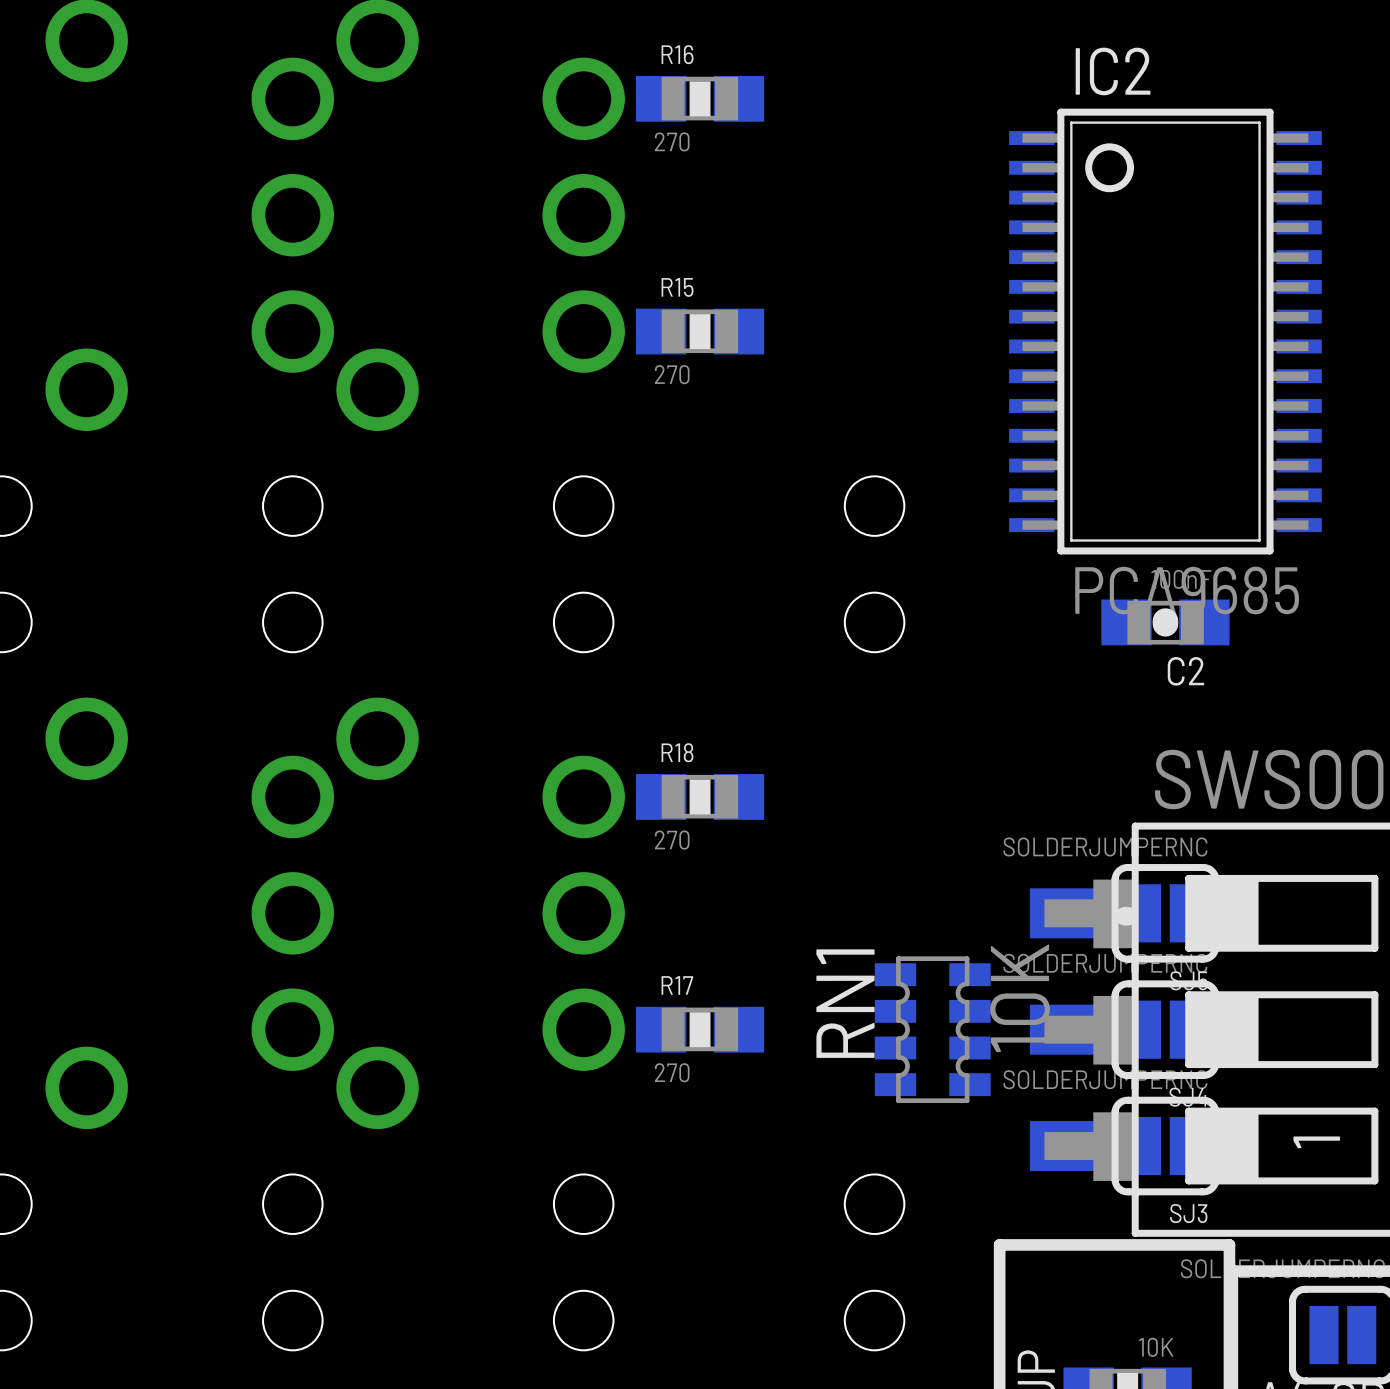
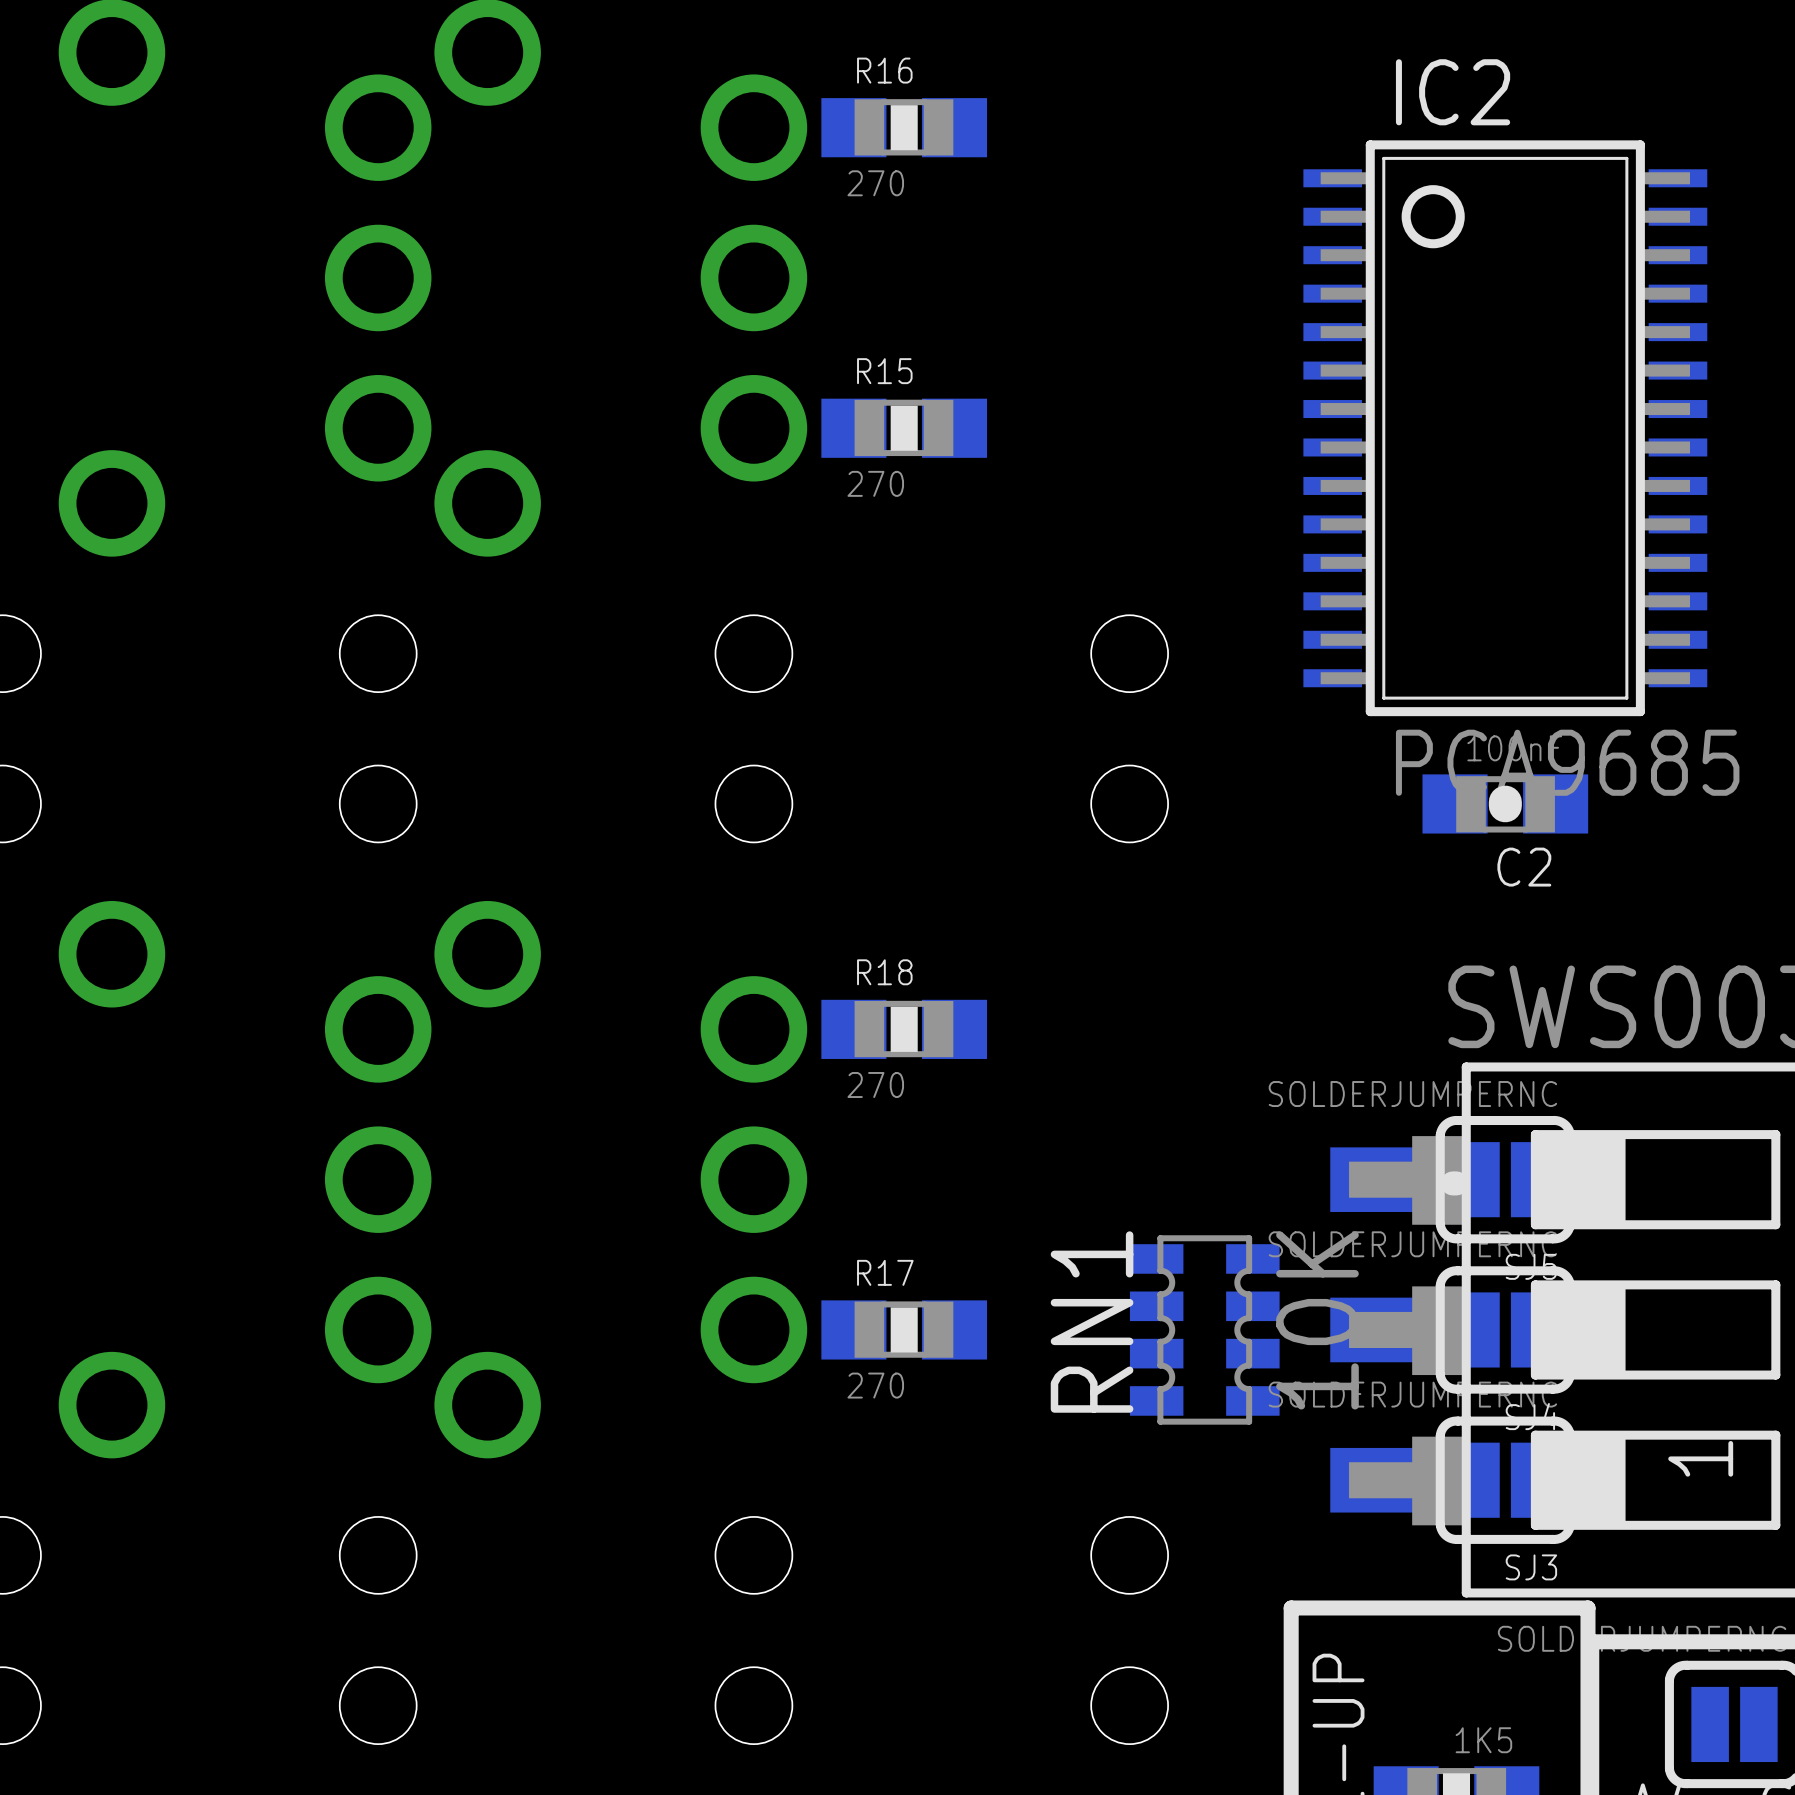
part value: 10K (1156, 1347) -> 1K5 (1483, 1740)

